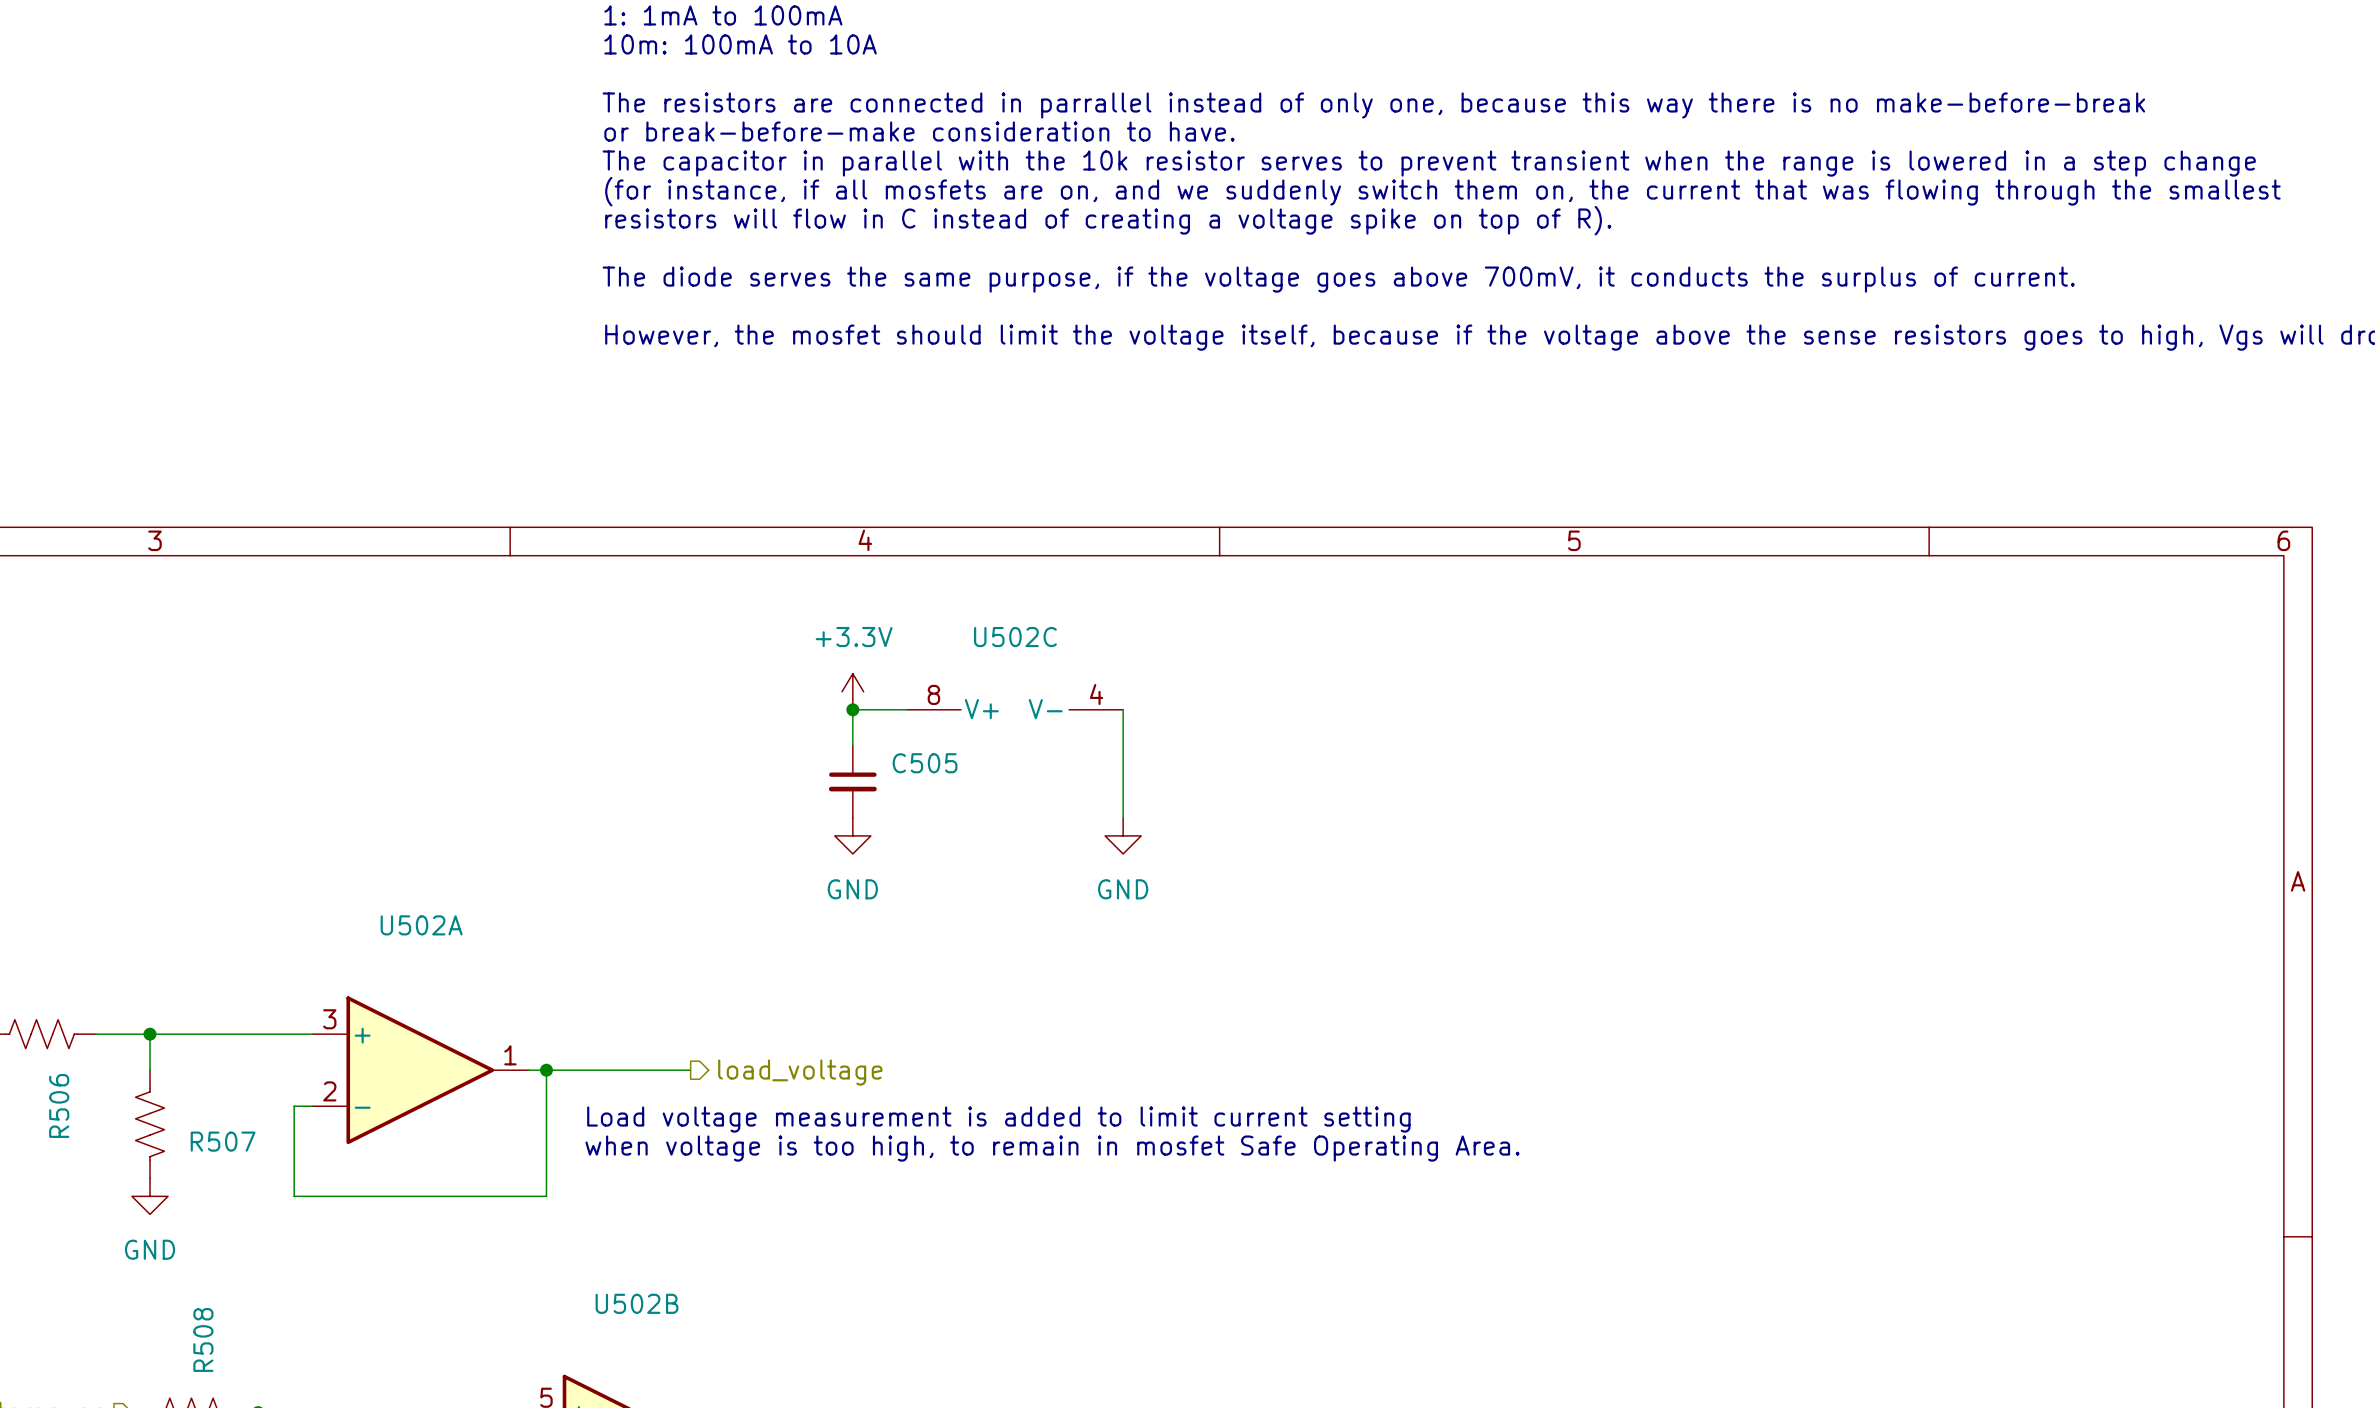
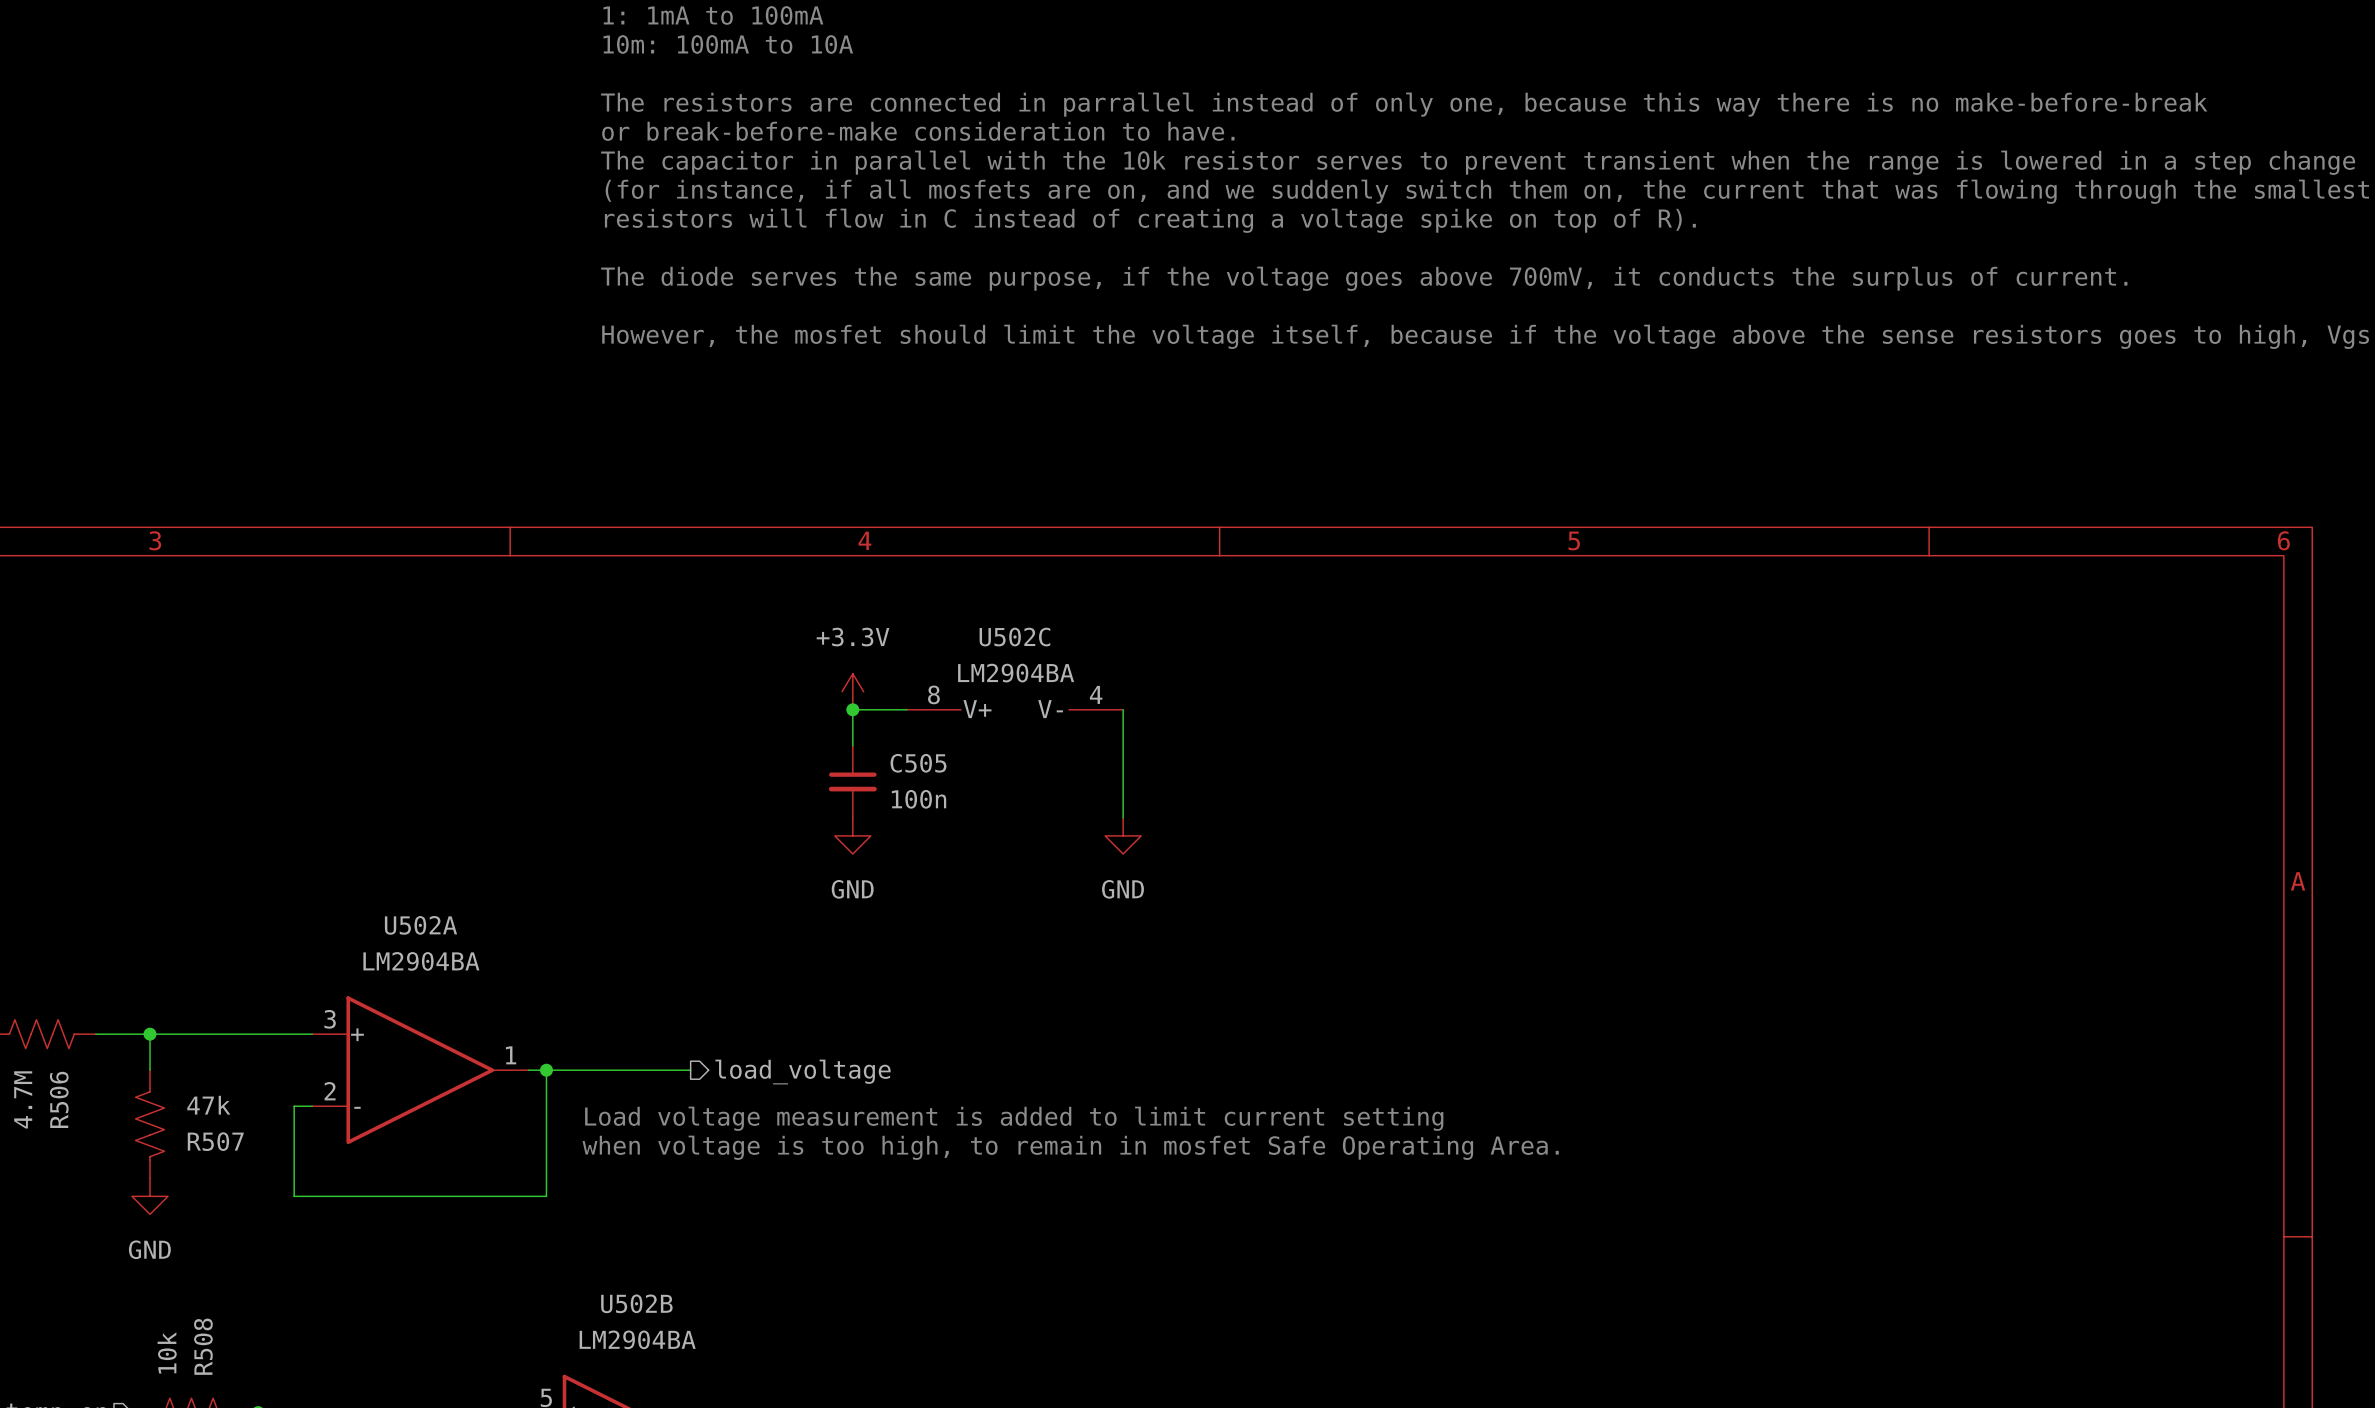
U502C value: none -> LM2904BA (1016, 673)
C505 value: none -> 100n (919, 799)
U502A value: none -> LM2904BA (421, 961)
R506 value: none -> 4.7M (23, 1099)
R507 value: none -> 47k (208, 1105)
U502B value: none -> LM2904BA (637, 1339)
R508 value: none -> 10k (167, 1352)

